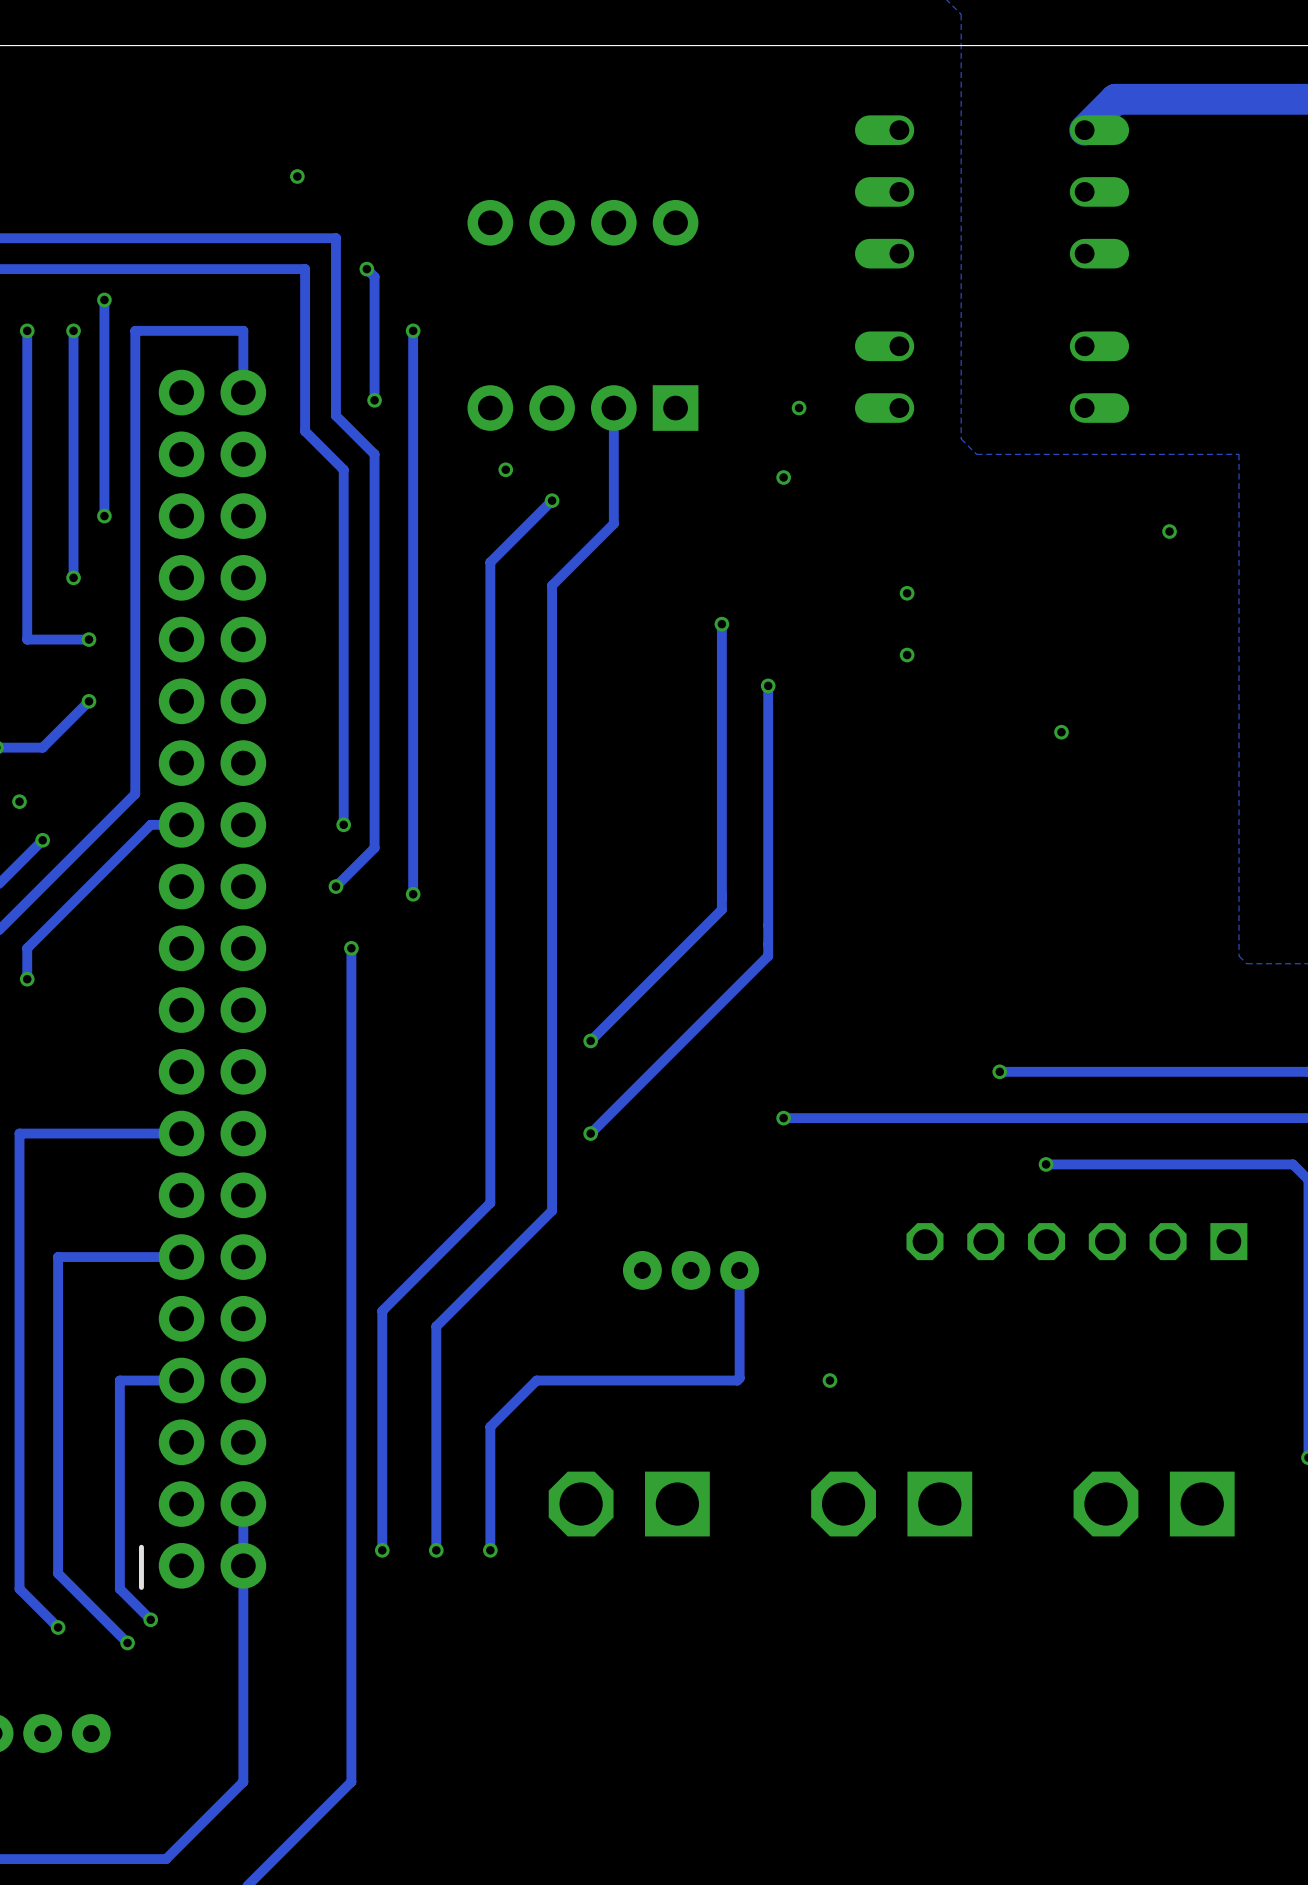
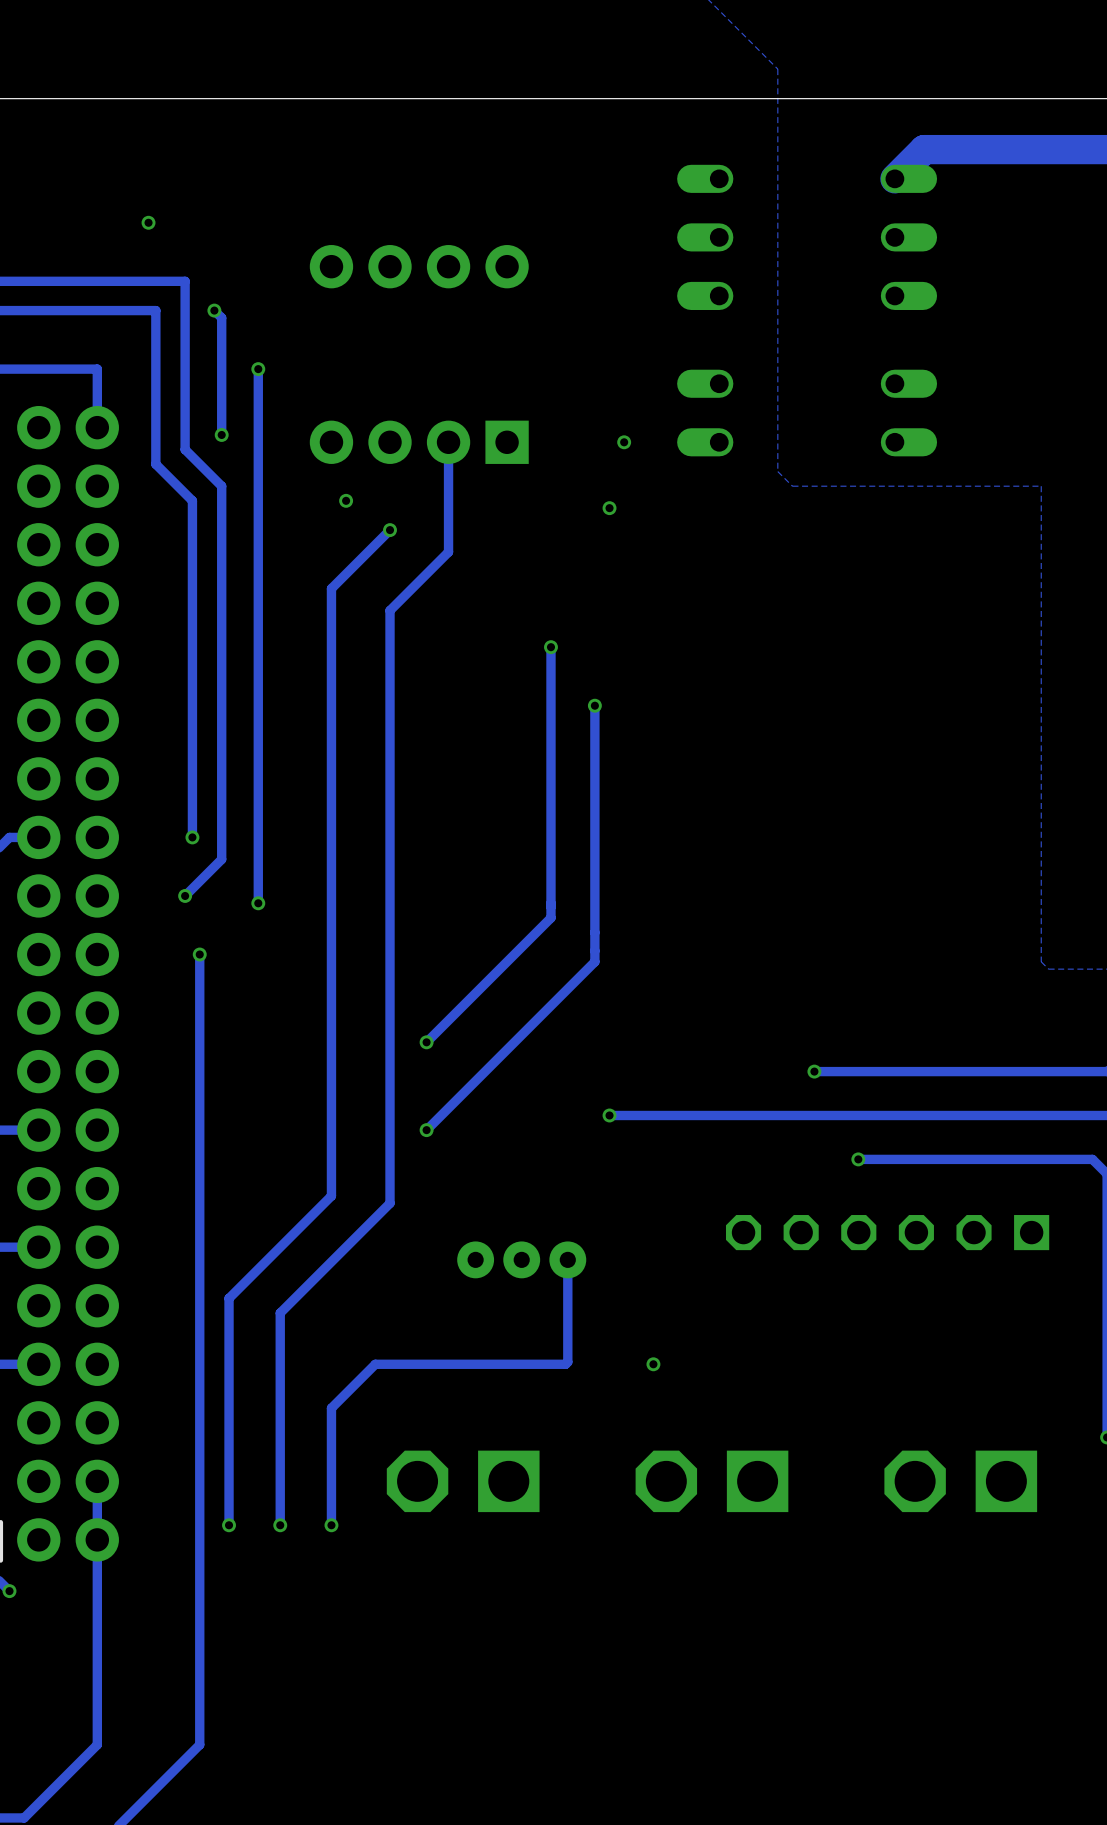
via: (1169, 531) -> none
via: (907, 593) -> none
via: (907, 655) -> none
via: (1061, 732) -> none

